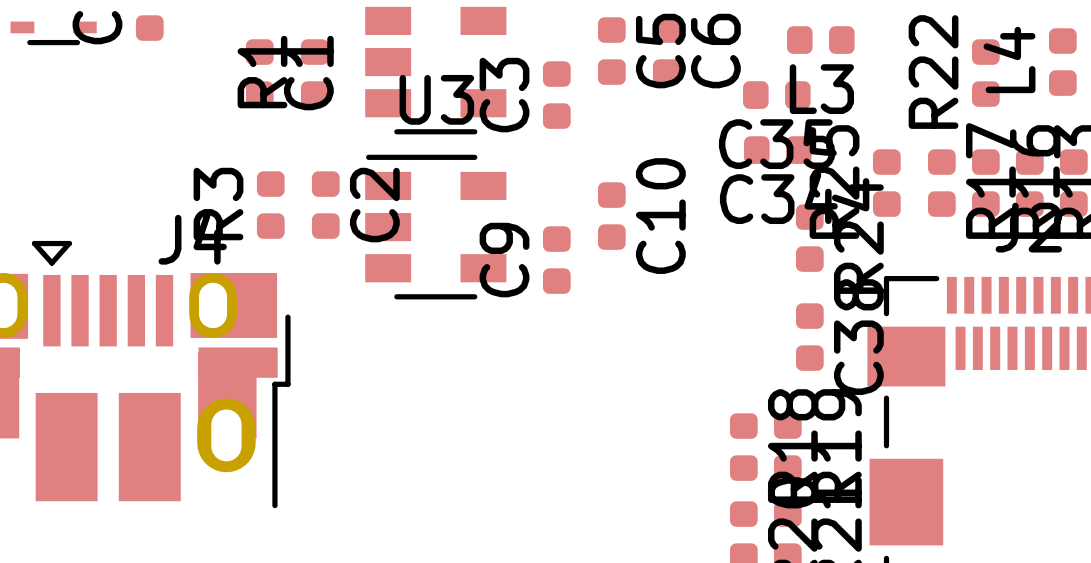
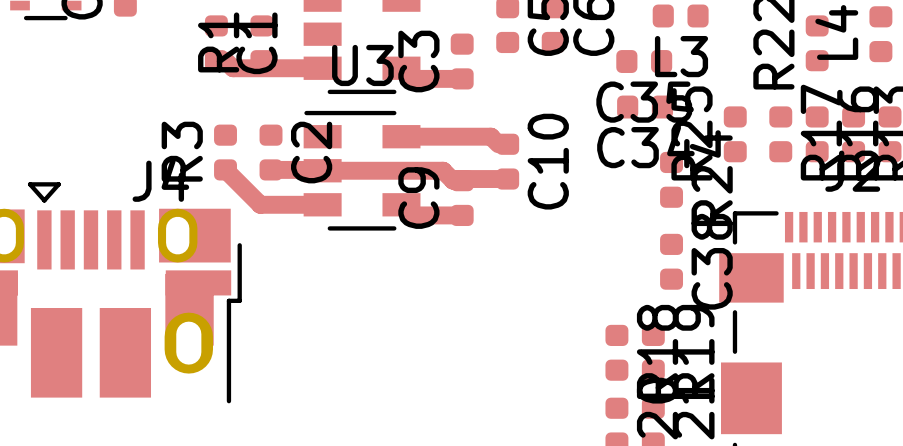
track: none -> (225, 60) (233, 68) (322, 68)
track: none -> (401, 68) (412, 78) (453, 78)
track: none -> (401, 136) (491, 136) (498, 144)
track: none -> (225, 169) (260, 204) (322, 204)
track: none -> (271, 169) (443, 170) (453, 180) (454, 179) (498, 179)
track: none -> (401, 204) (412, 215) (453, 215)

